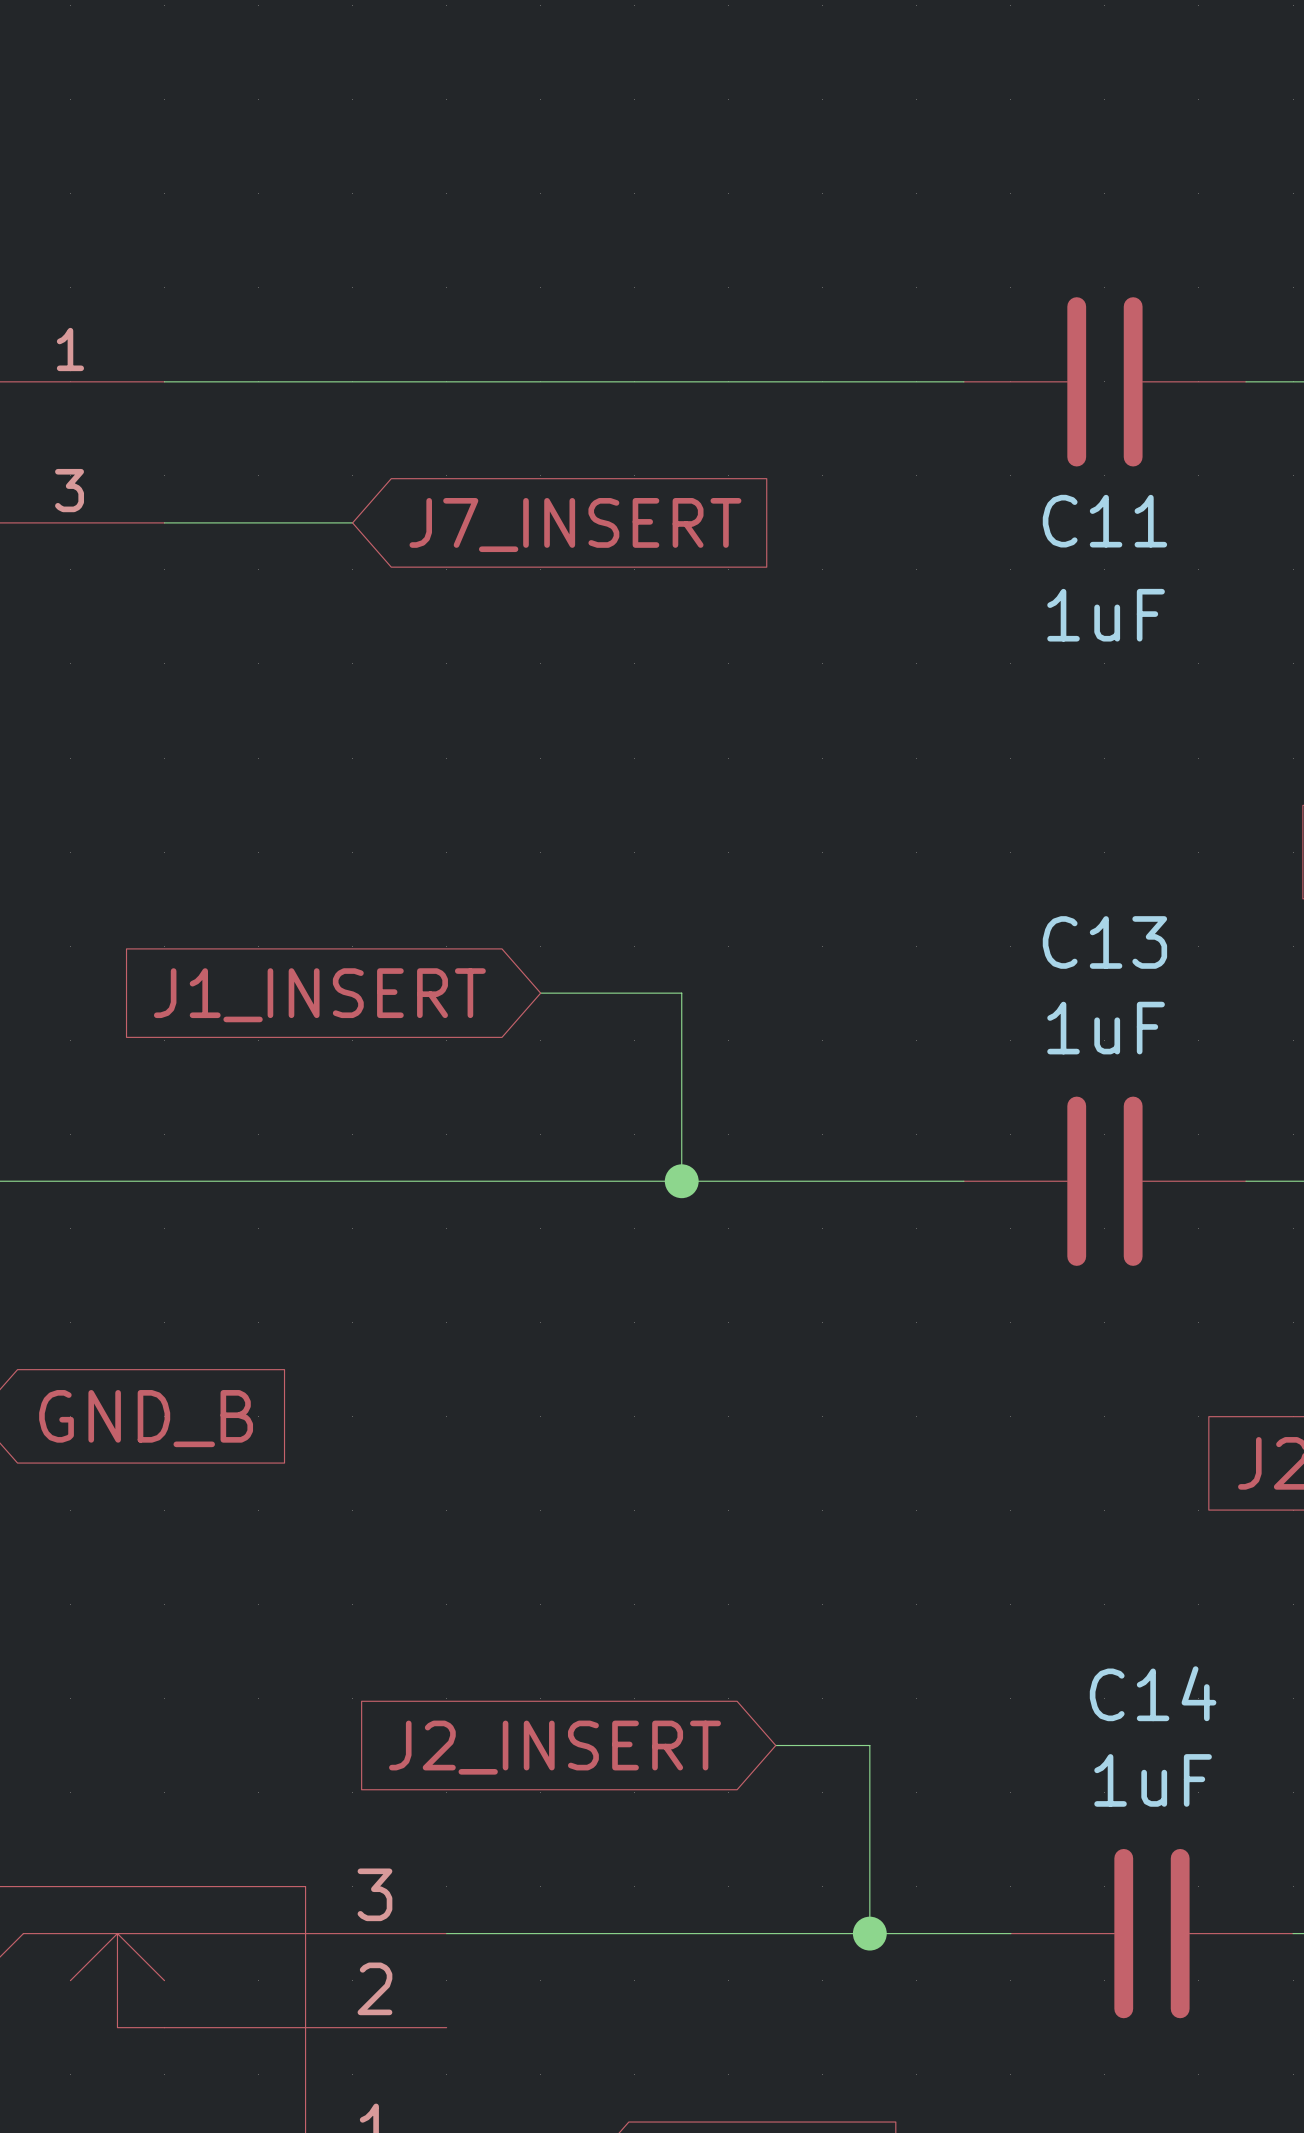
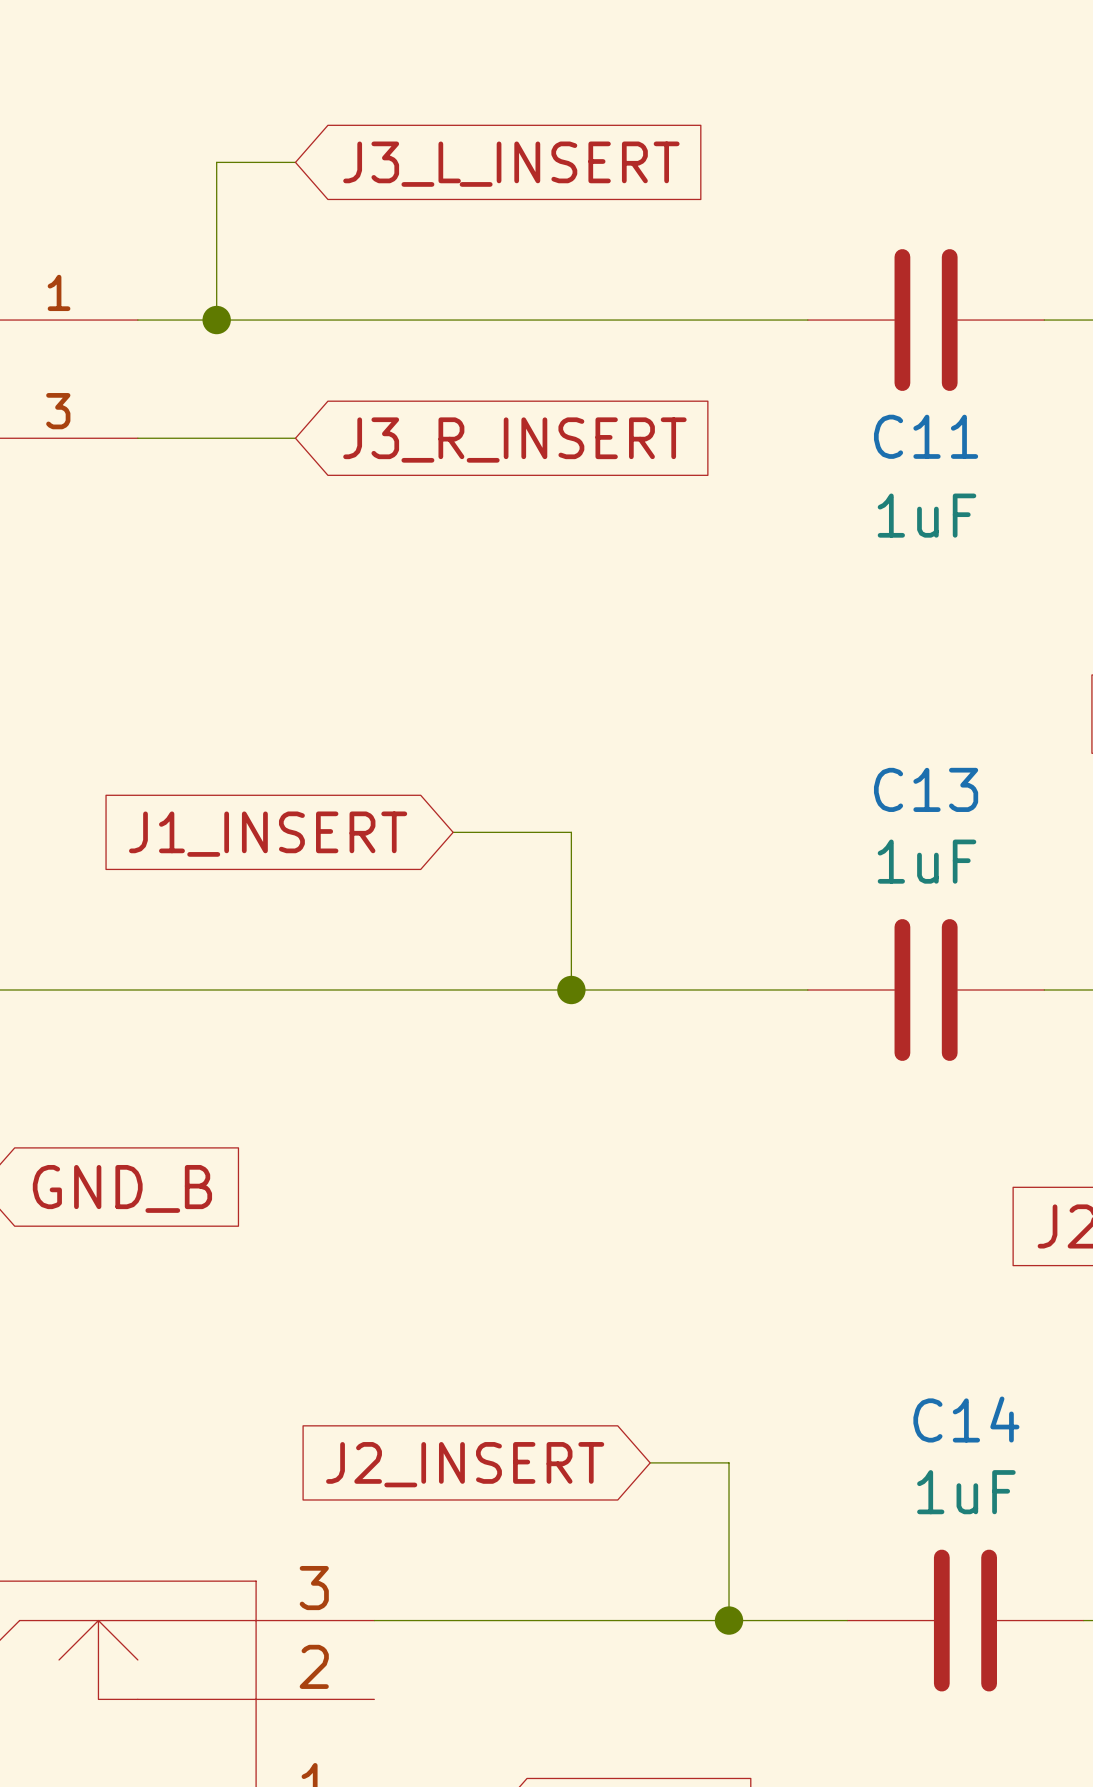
wire: none -> (295, 162) (216, 162) (216, 320)
global label: none -> J3_L_INSERT (511, 164)
junction: none -> (216, 320)
global label: J7_INSERT (575, 525) -> J3_R_INSERT (514, 440)

